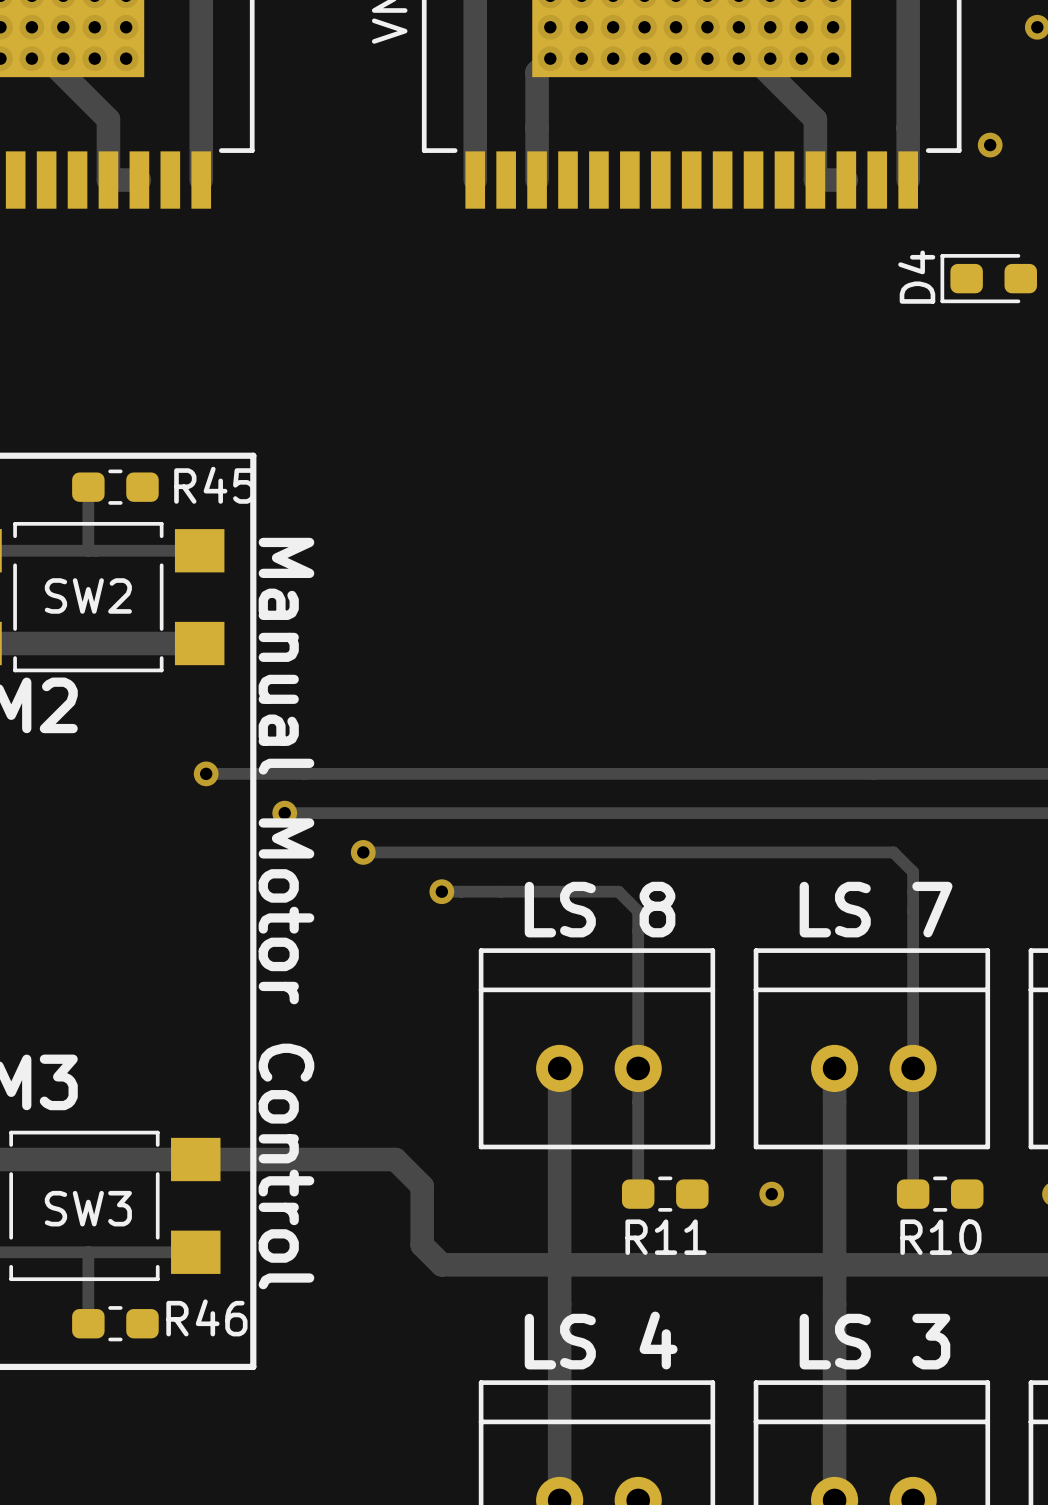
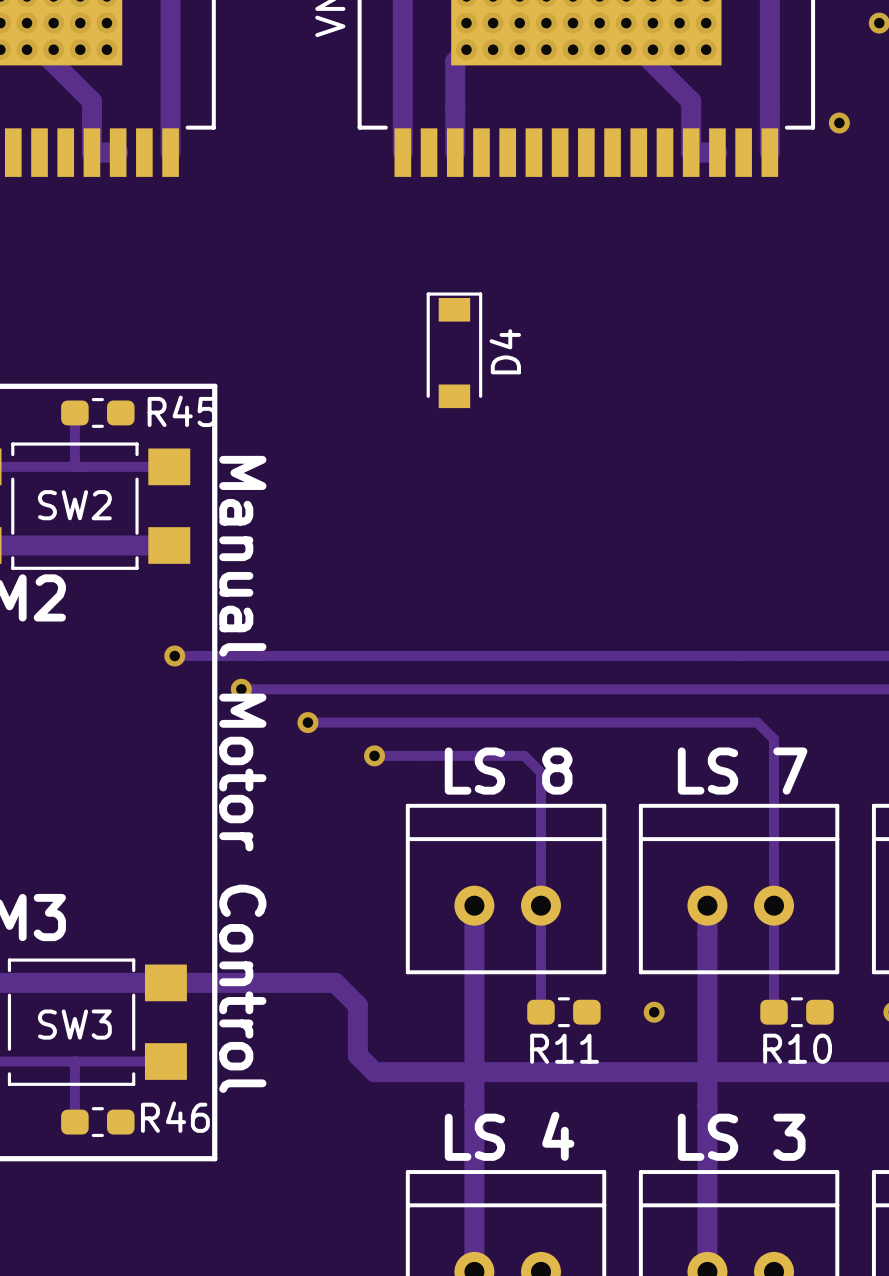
D4 footprint: [940, 254, 1037, 304] -> [426, 292, 483, 409]
D4 name position: D4 (916, 277) -> D4 (505, 351)

